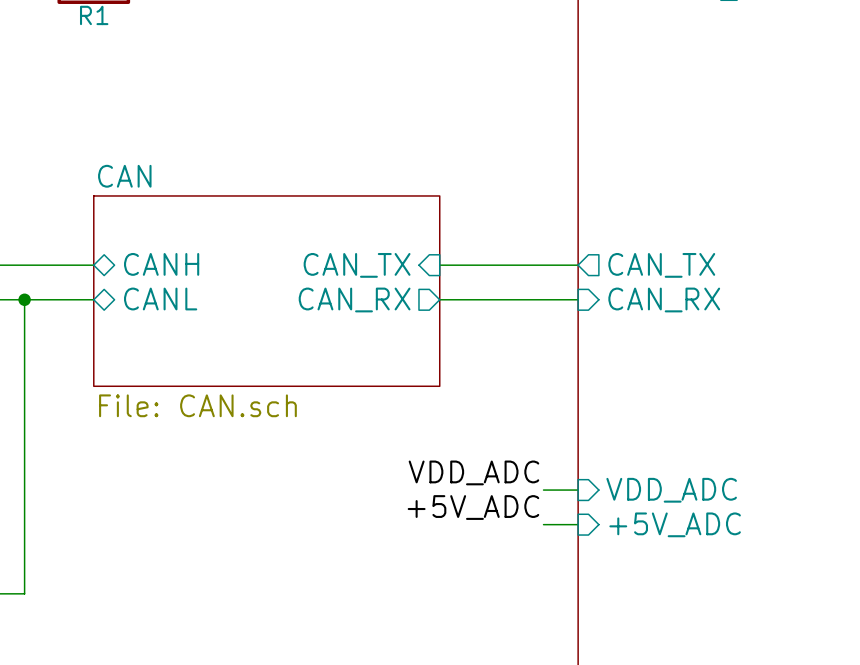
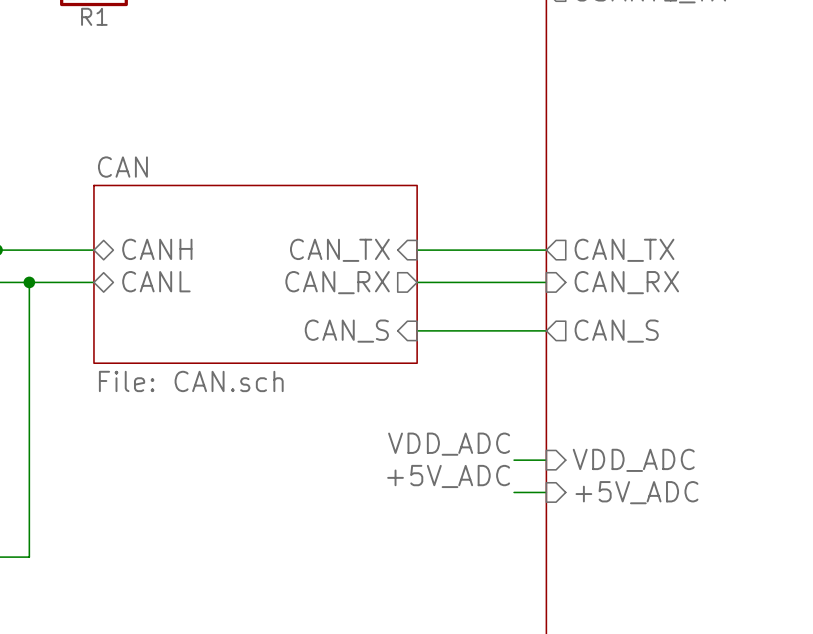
sheet pin: none -> CAN_S (346, 331)
wire: none -> (417, 330) (546, 330)
sheet pin: none -> CAN_S (616, 331)

